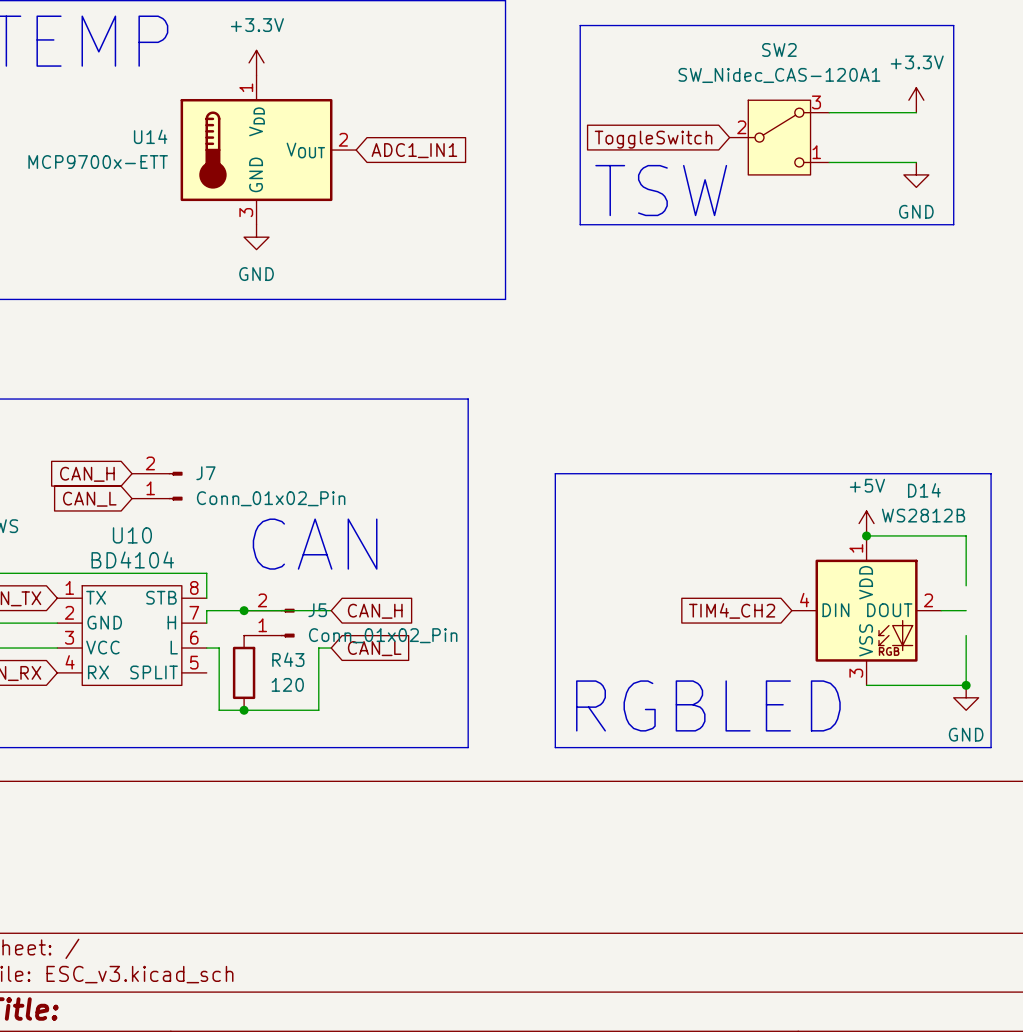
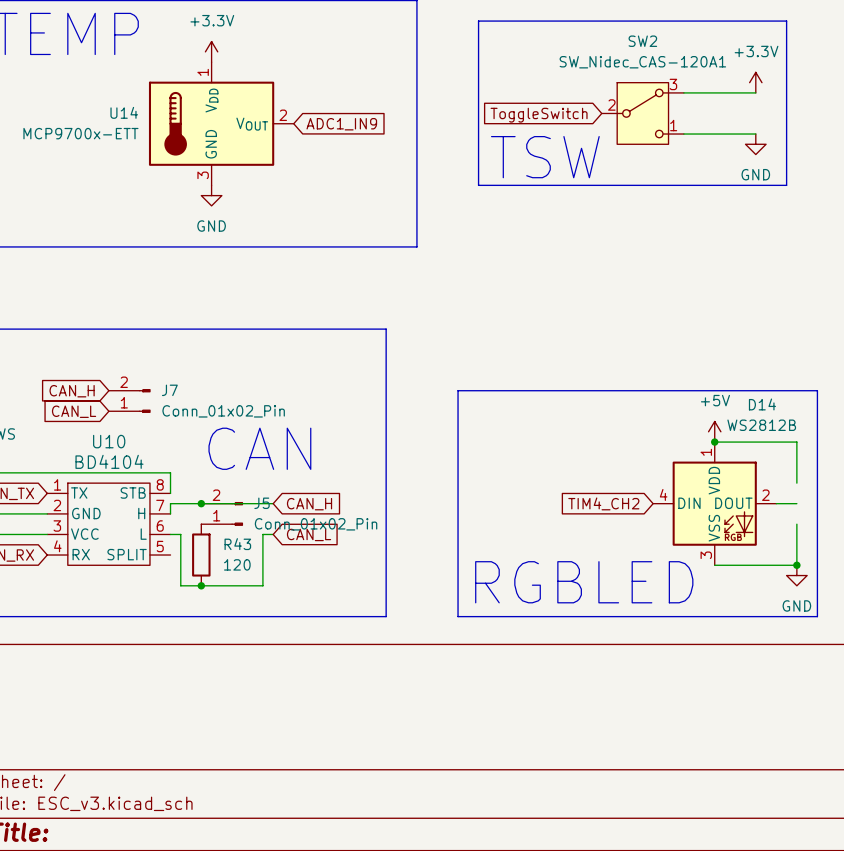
global label: ADC1_IN1 (414, 150) -> ADC1_IN9 (341, 124)

